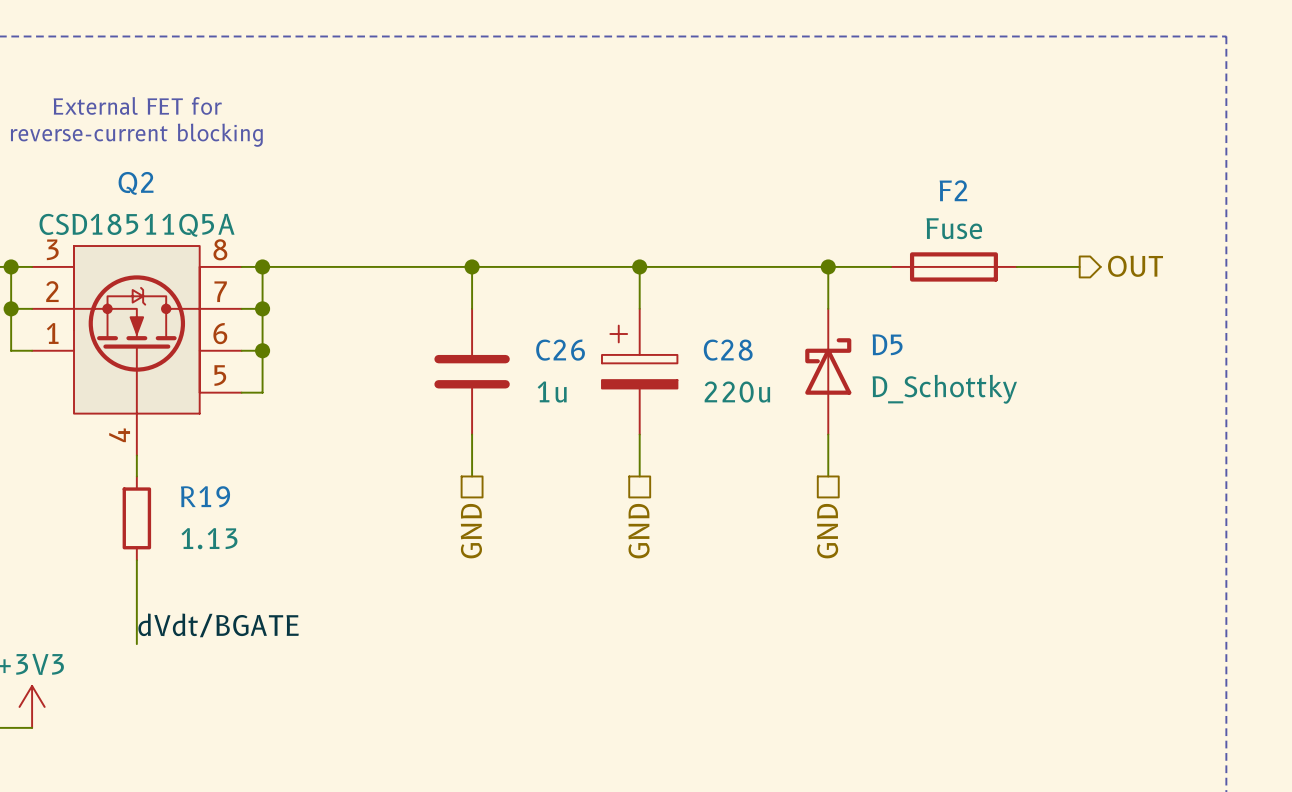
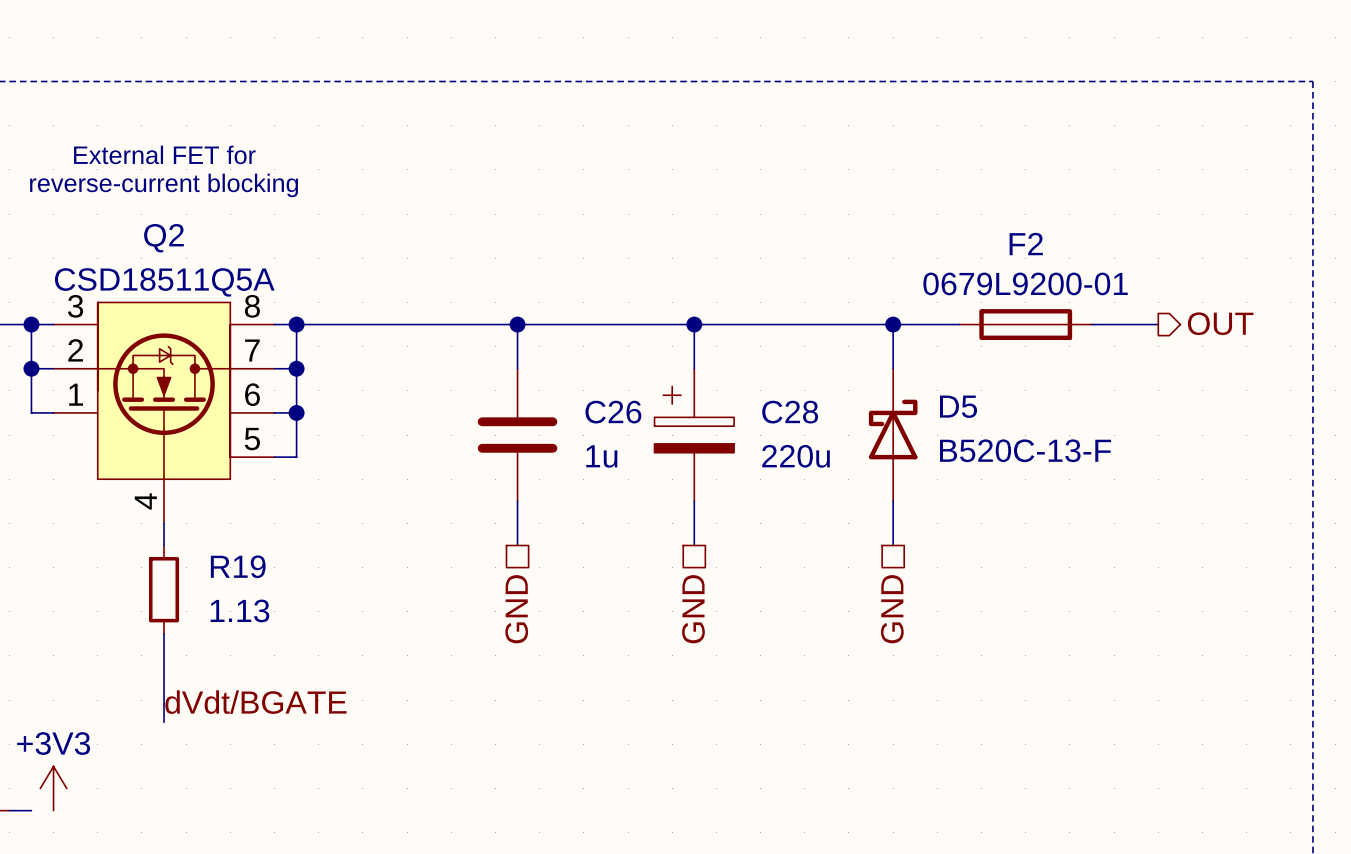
F2 value: Fuse (954, 228) -> 0679L9200-01 (1025, 283)
D5 value: D_Schottky (944, 389) -> B520C-13-F (1025, 450)
wire: (11, 727) (32, 727) -> none

